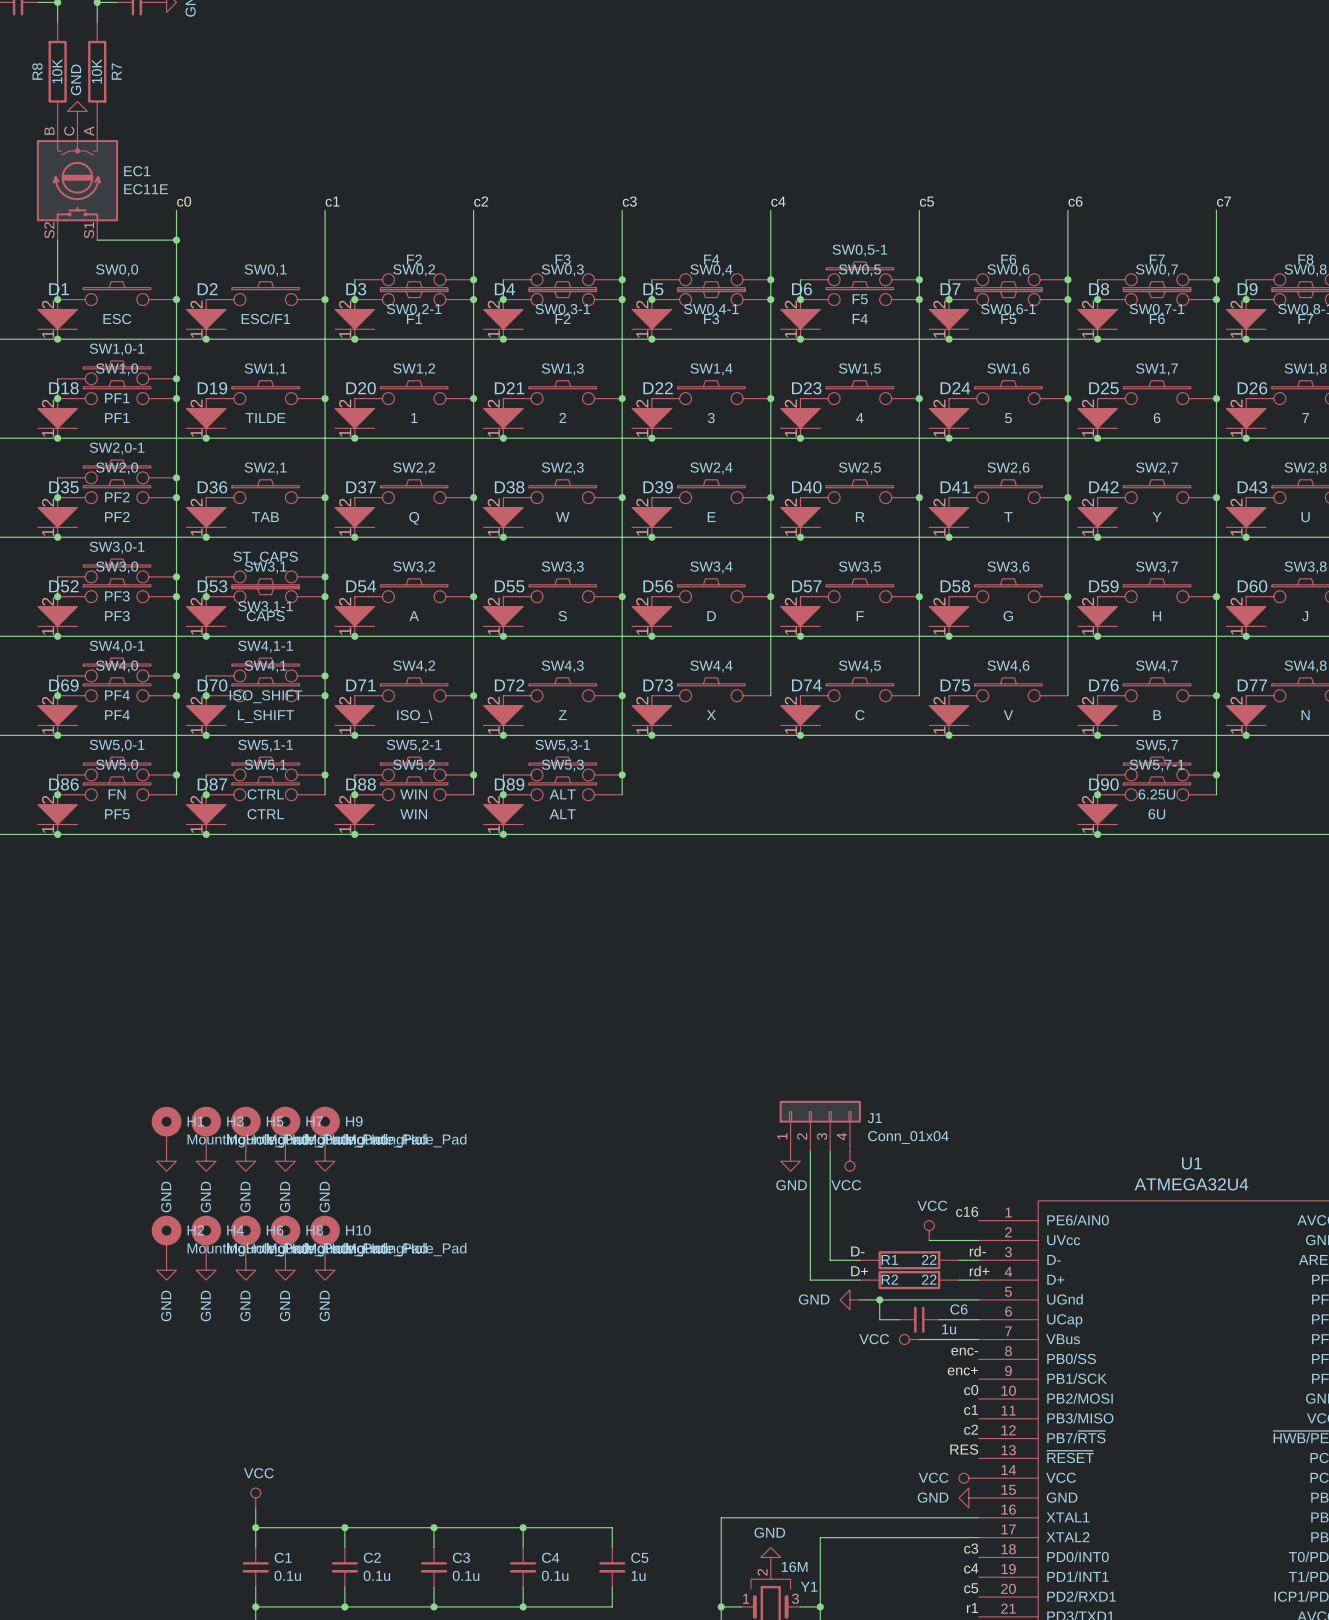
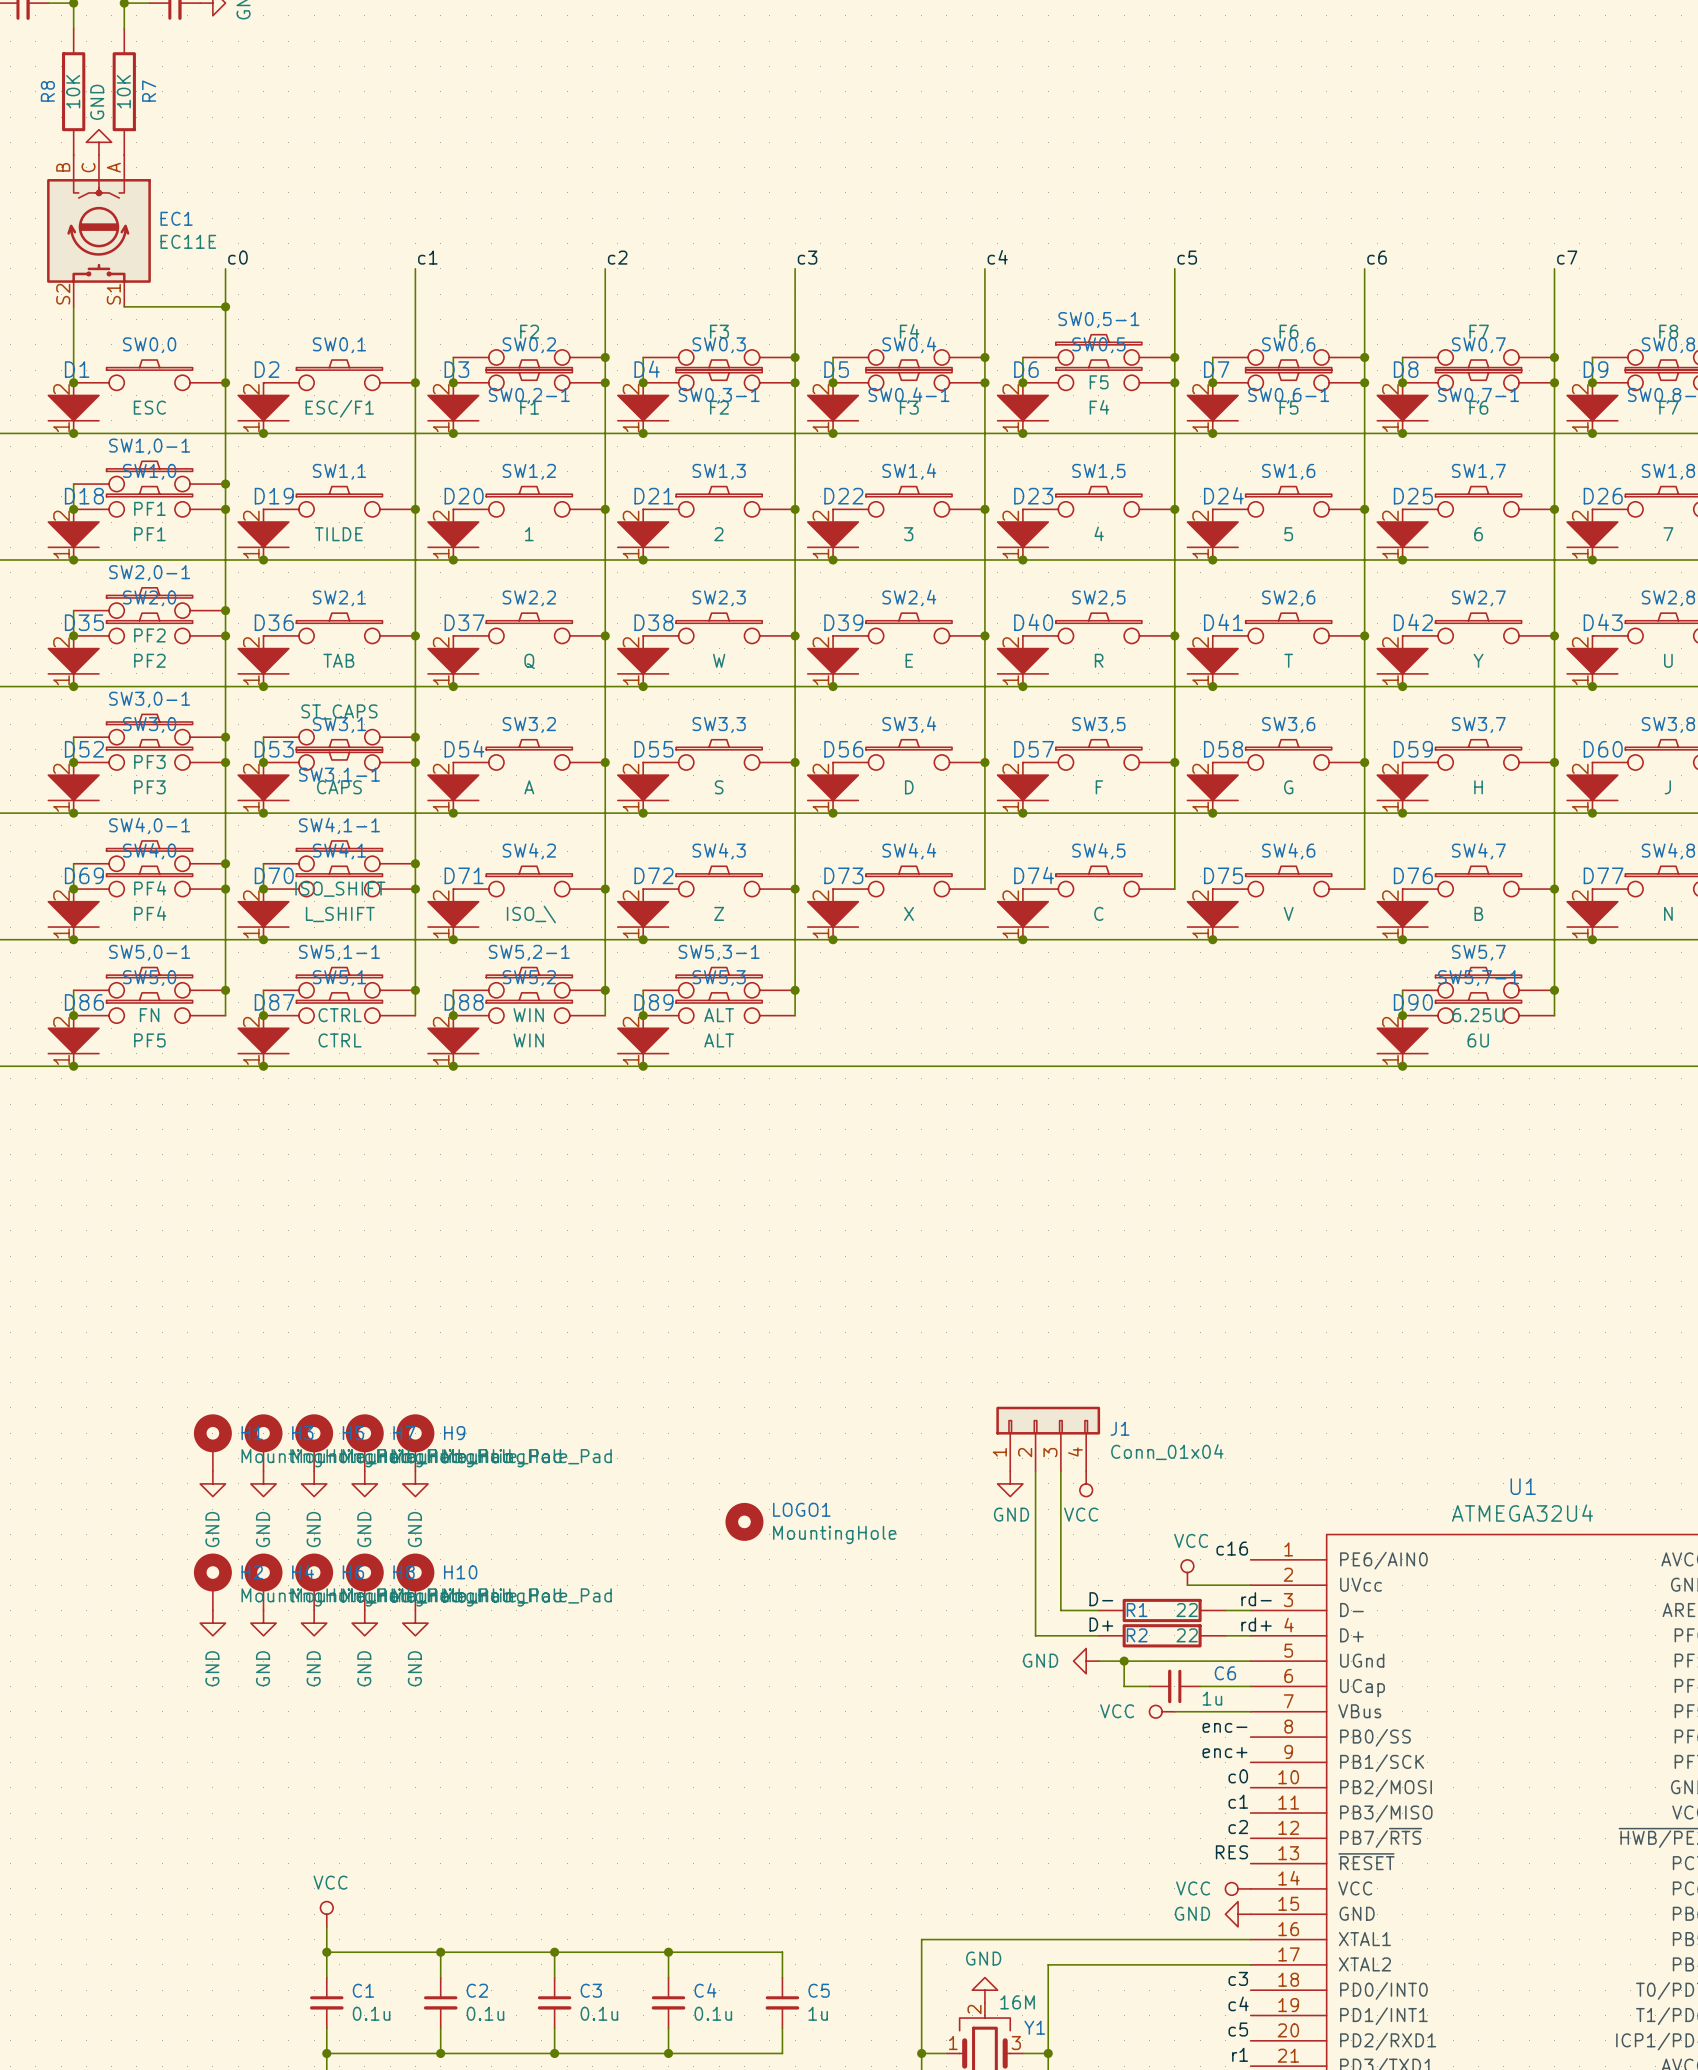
LOGO1: none -> MountingHole (744, 1521)

